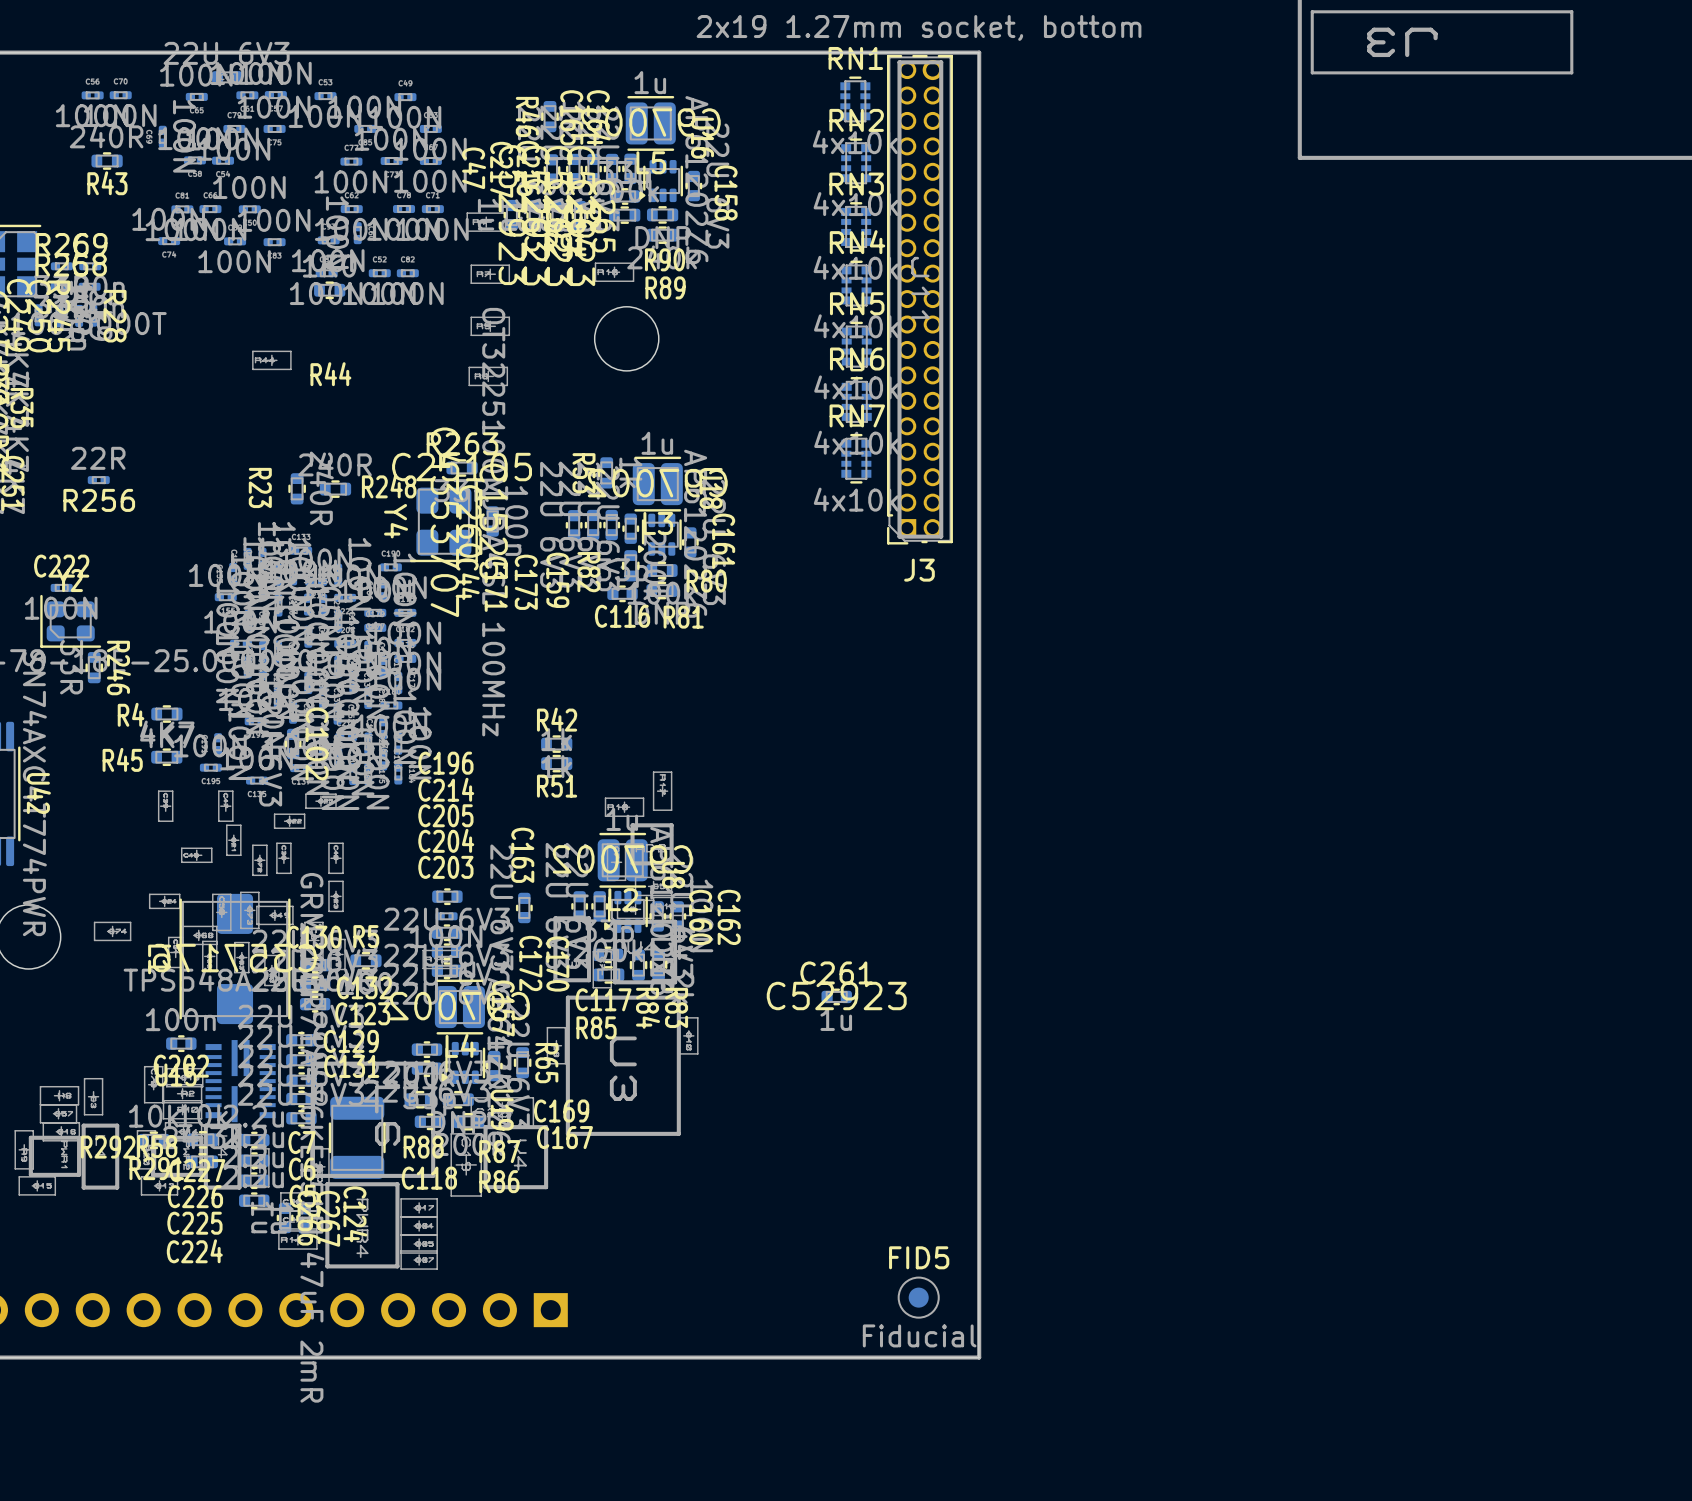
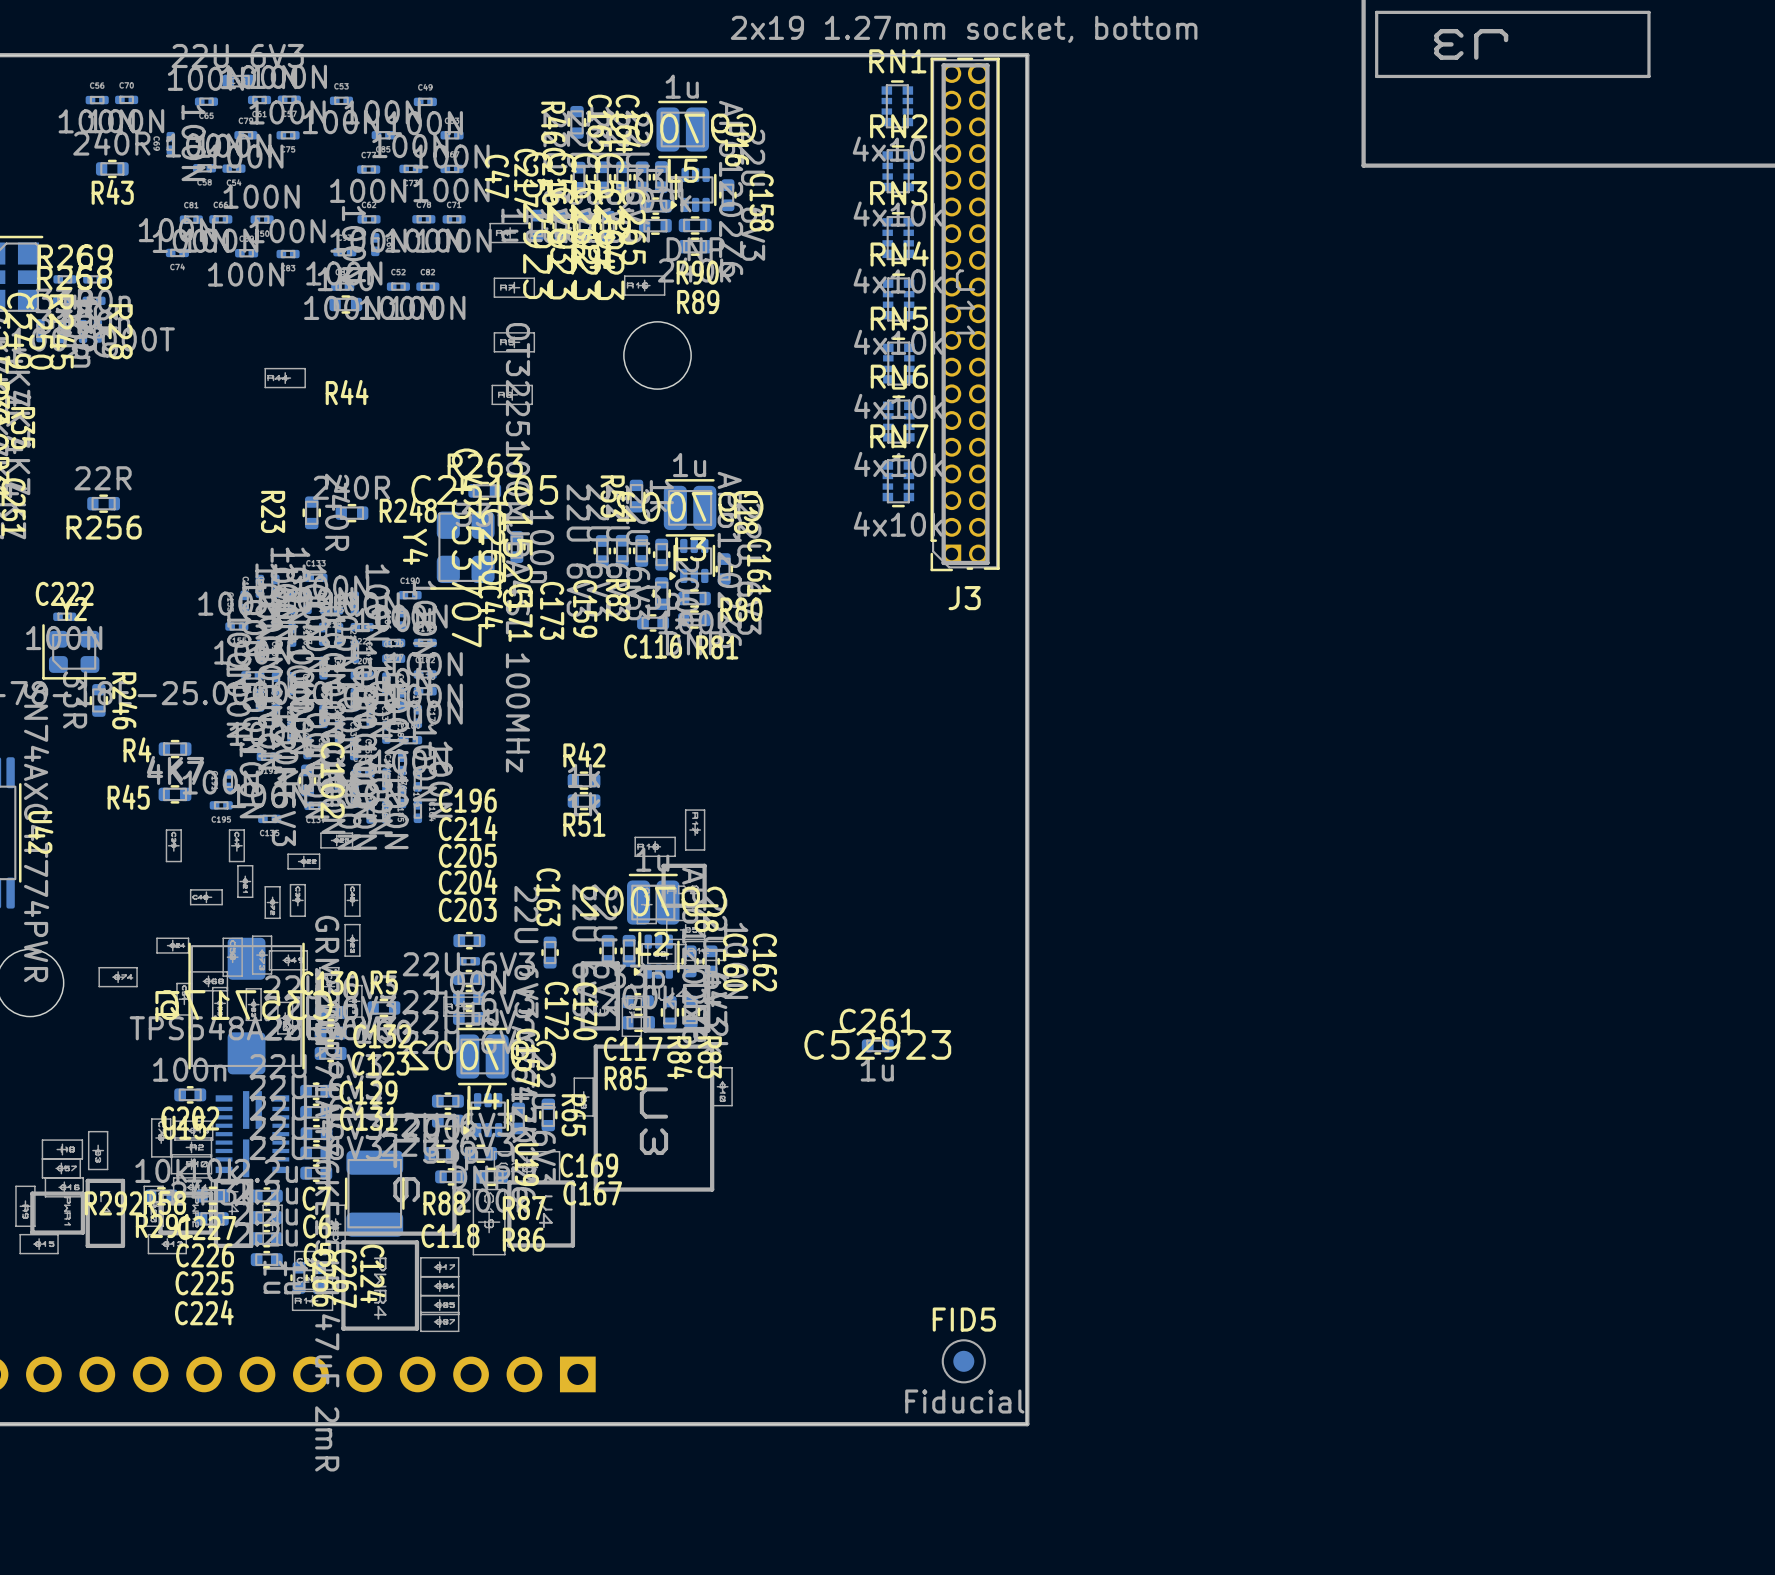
R256 footprint: [87, 476, 110, 485] -> [87, 494, 121, 513]

